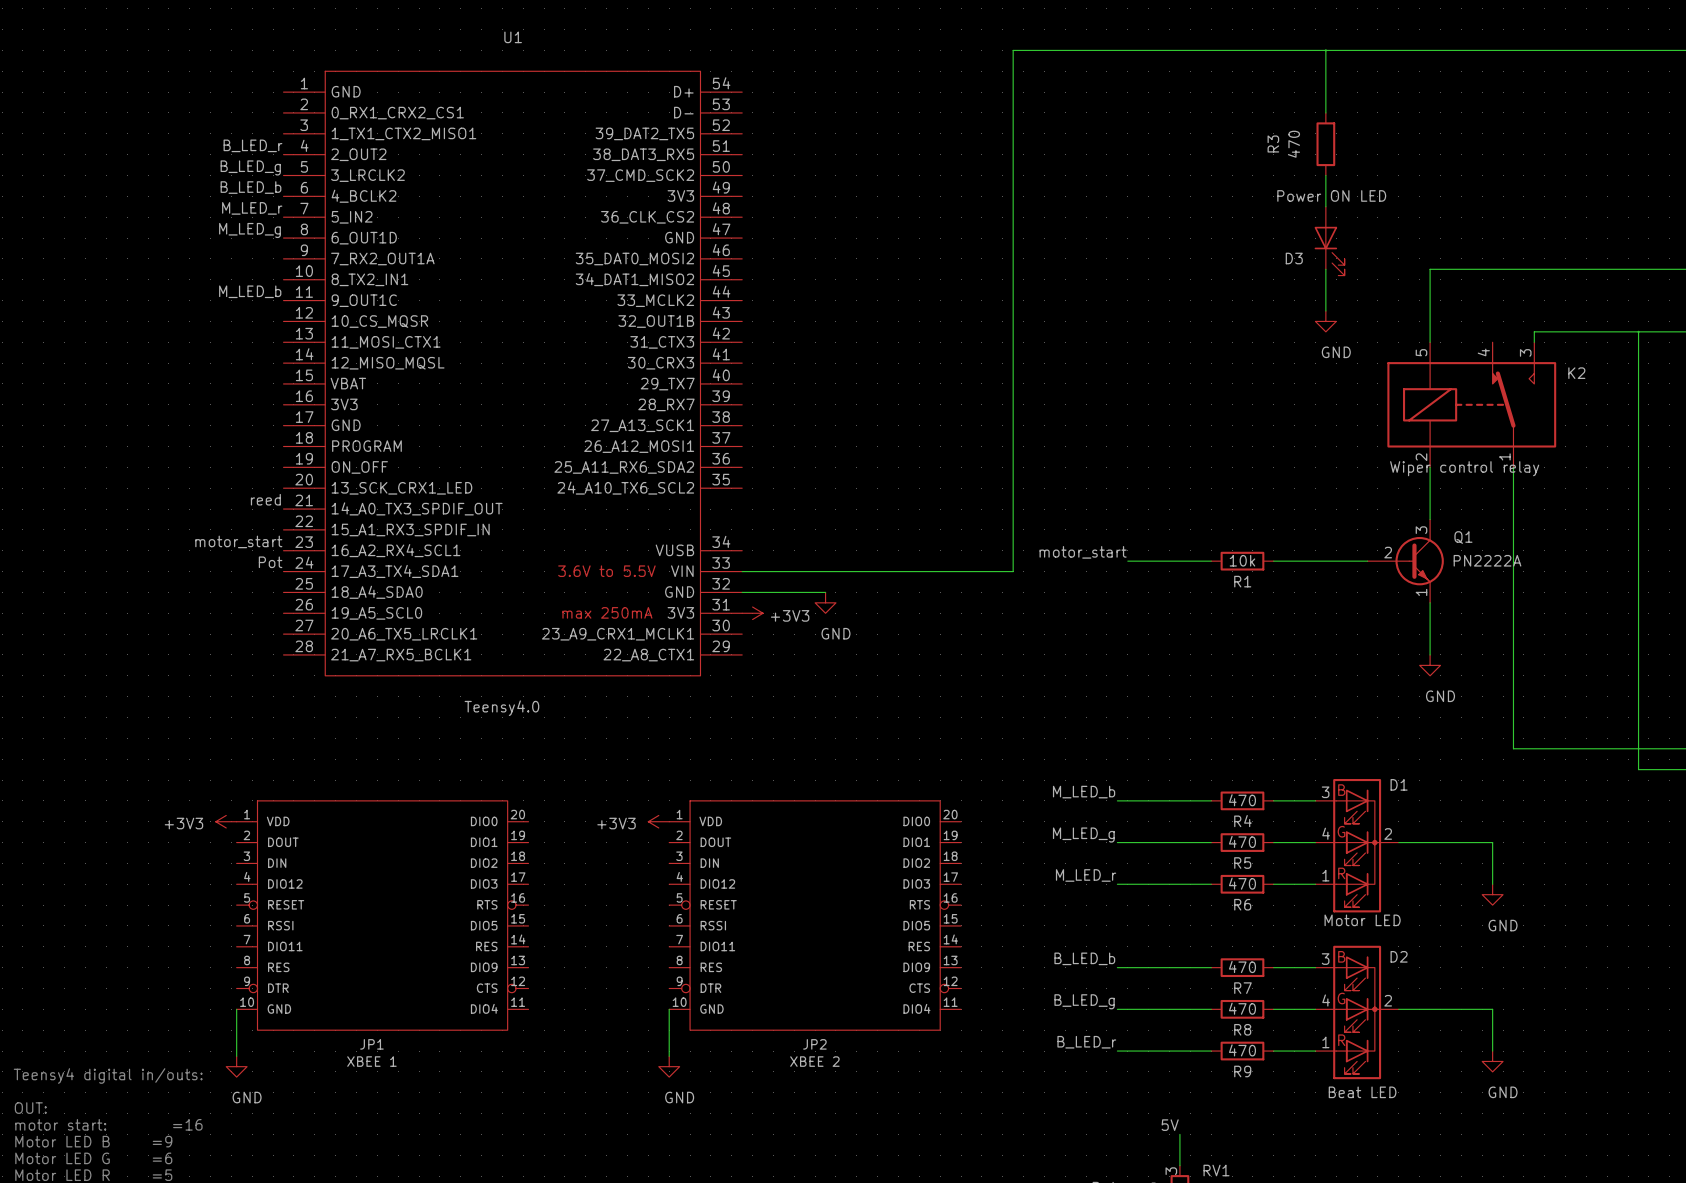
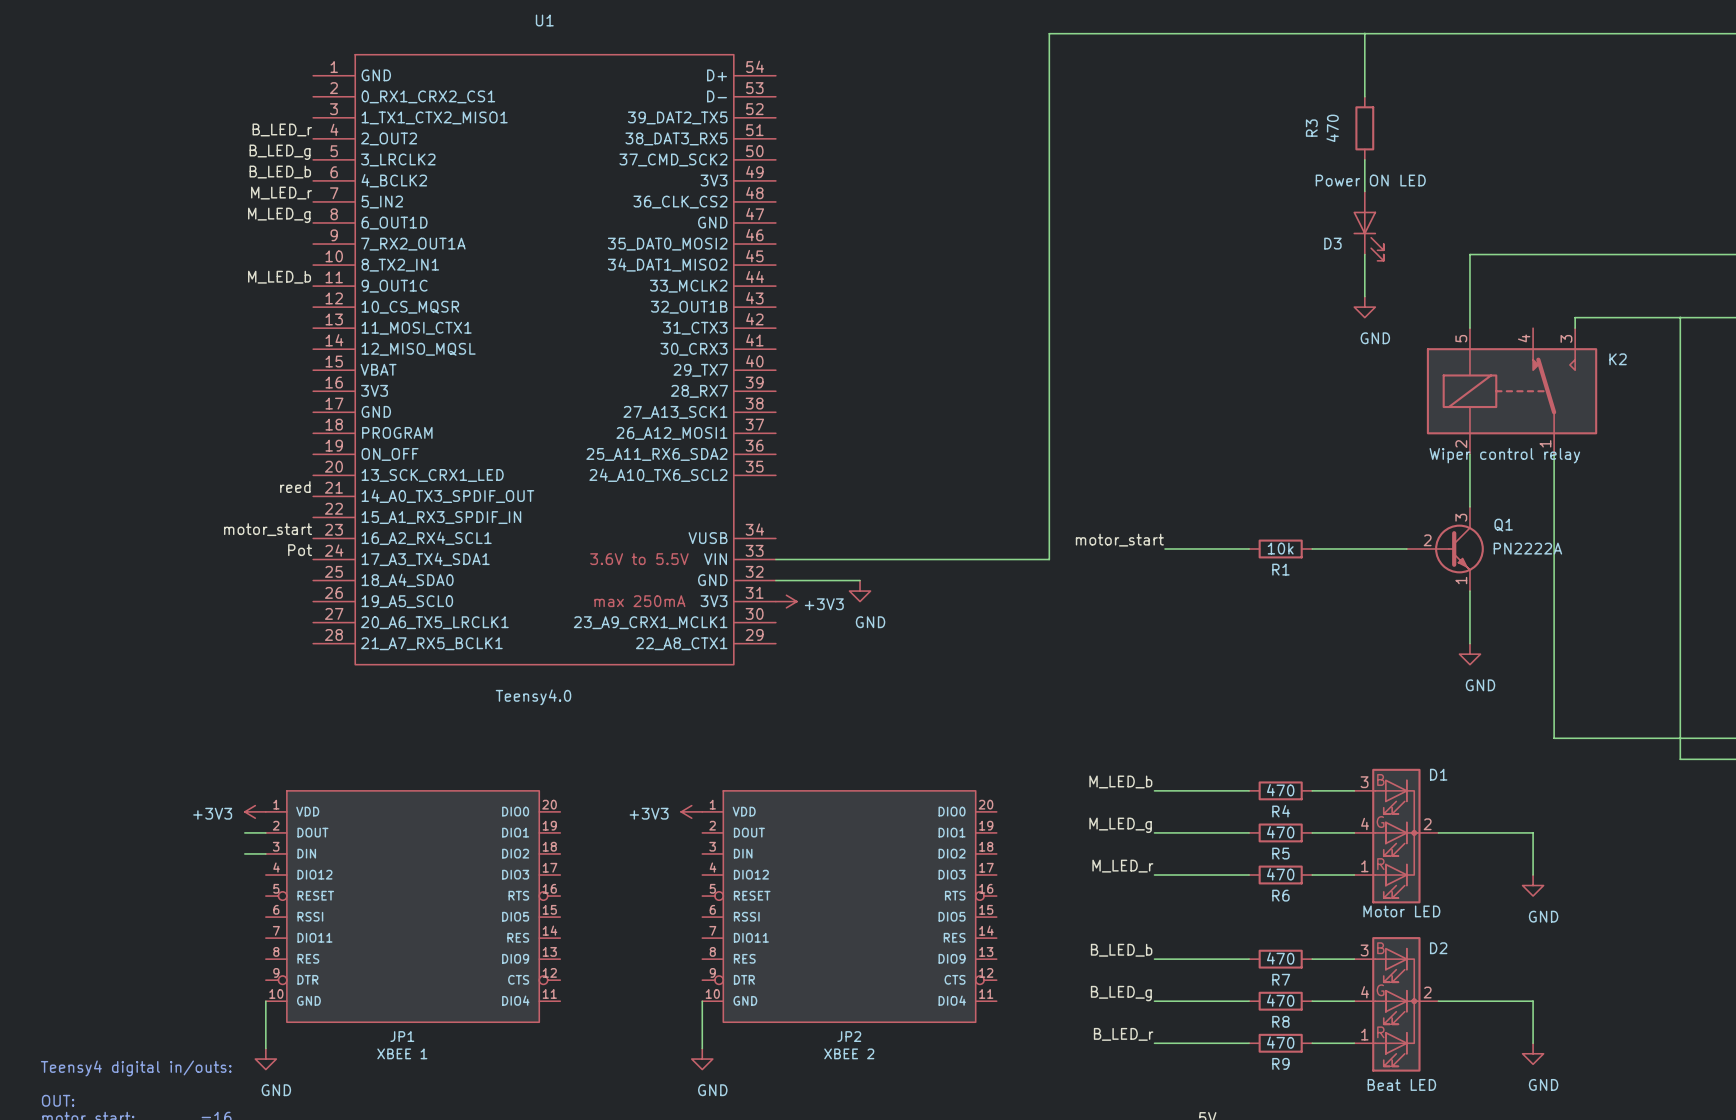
wire: none -> (244, 832) (265, 832)
wire: none -> (244, 853) (265, 853)

